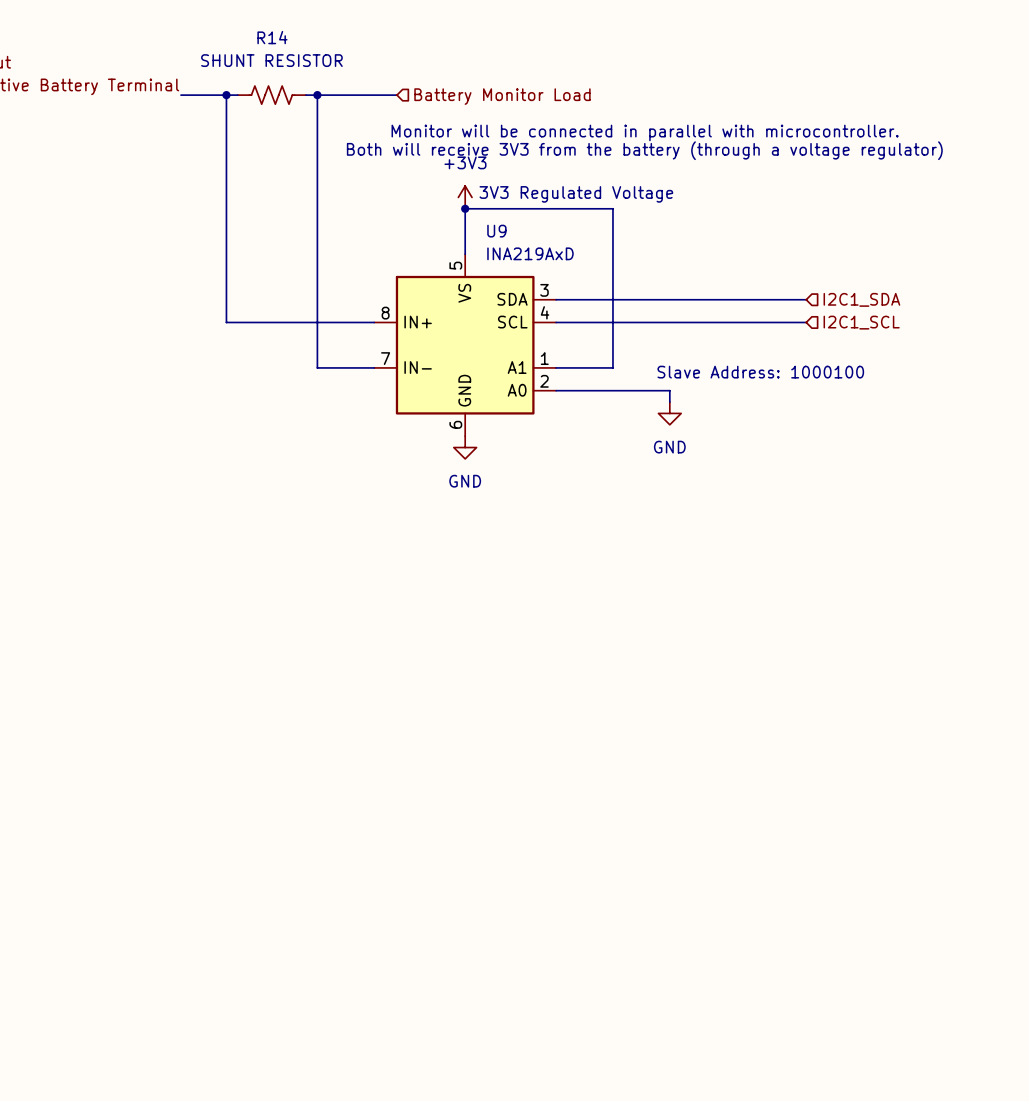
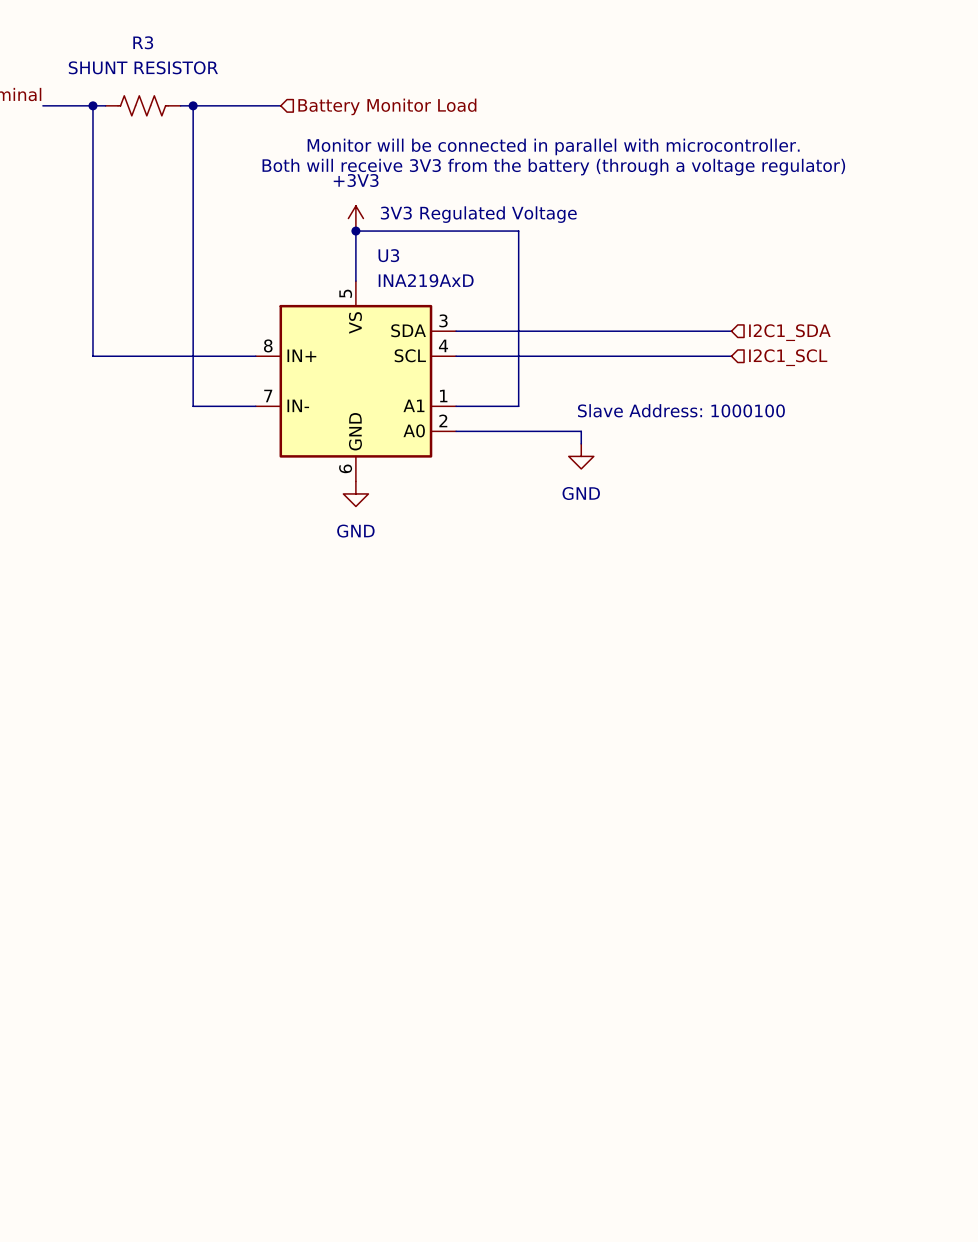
R14 name: R14 (272, 37) -> R3 (143, 42)
U9 name: U9 (496, 231) -> U3 (388, 255)

